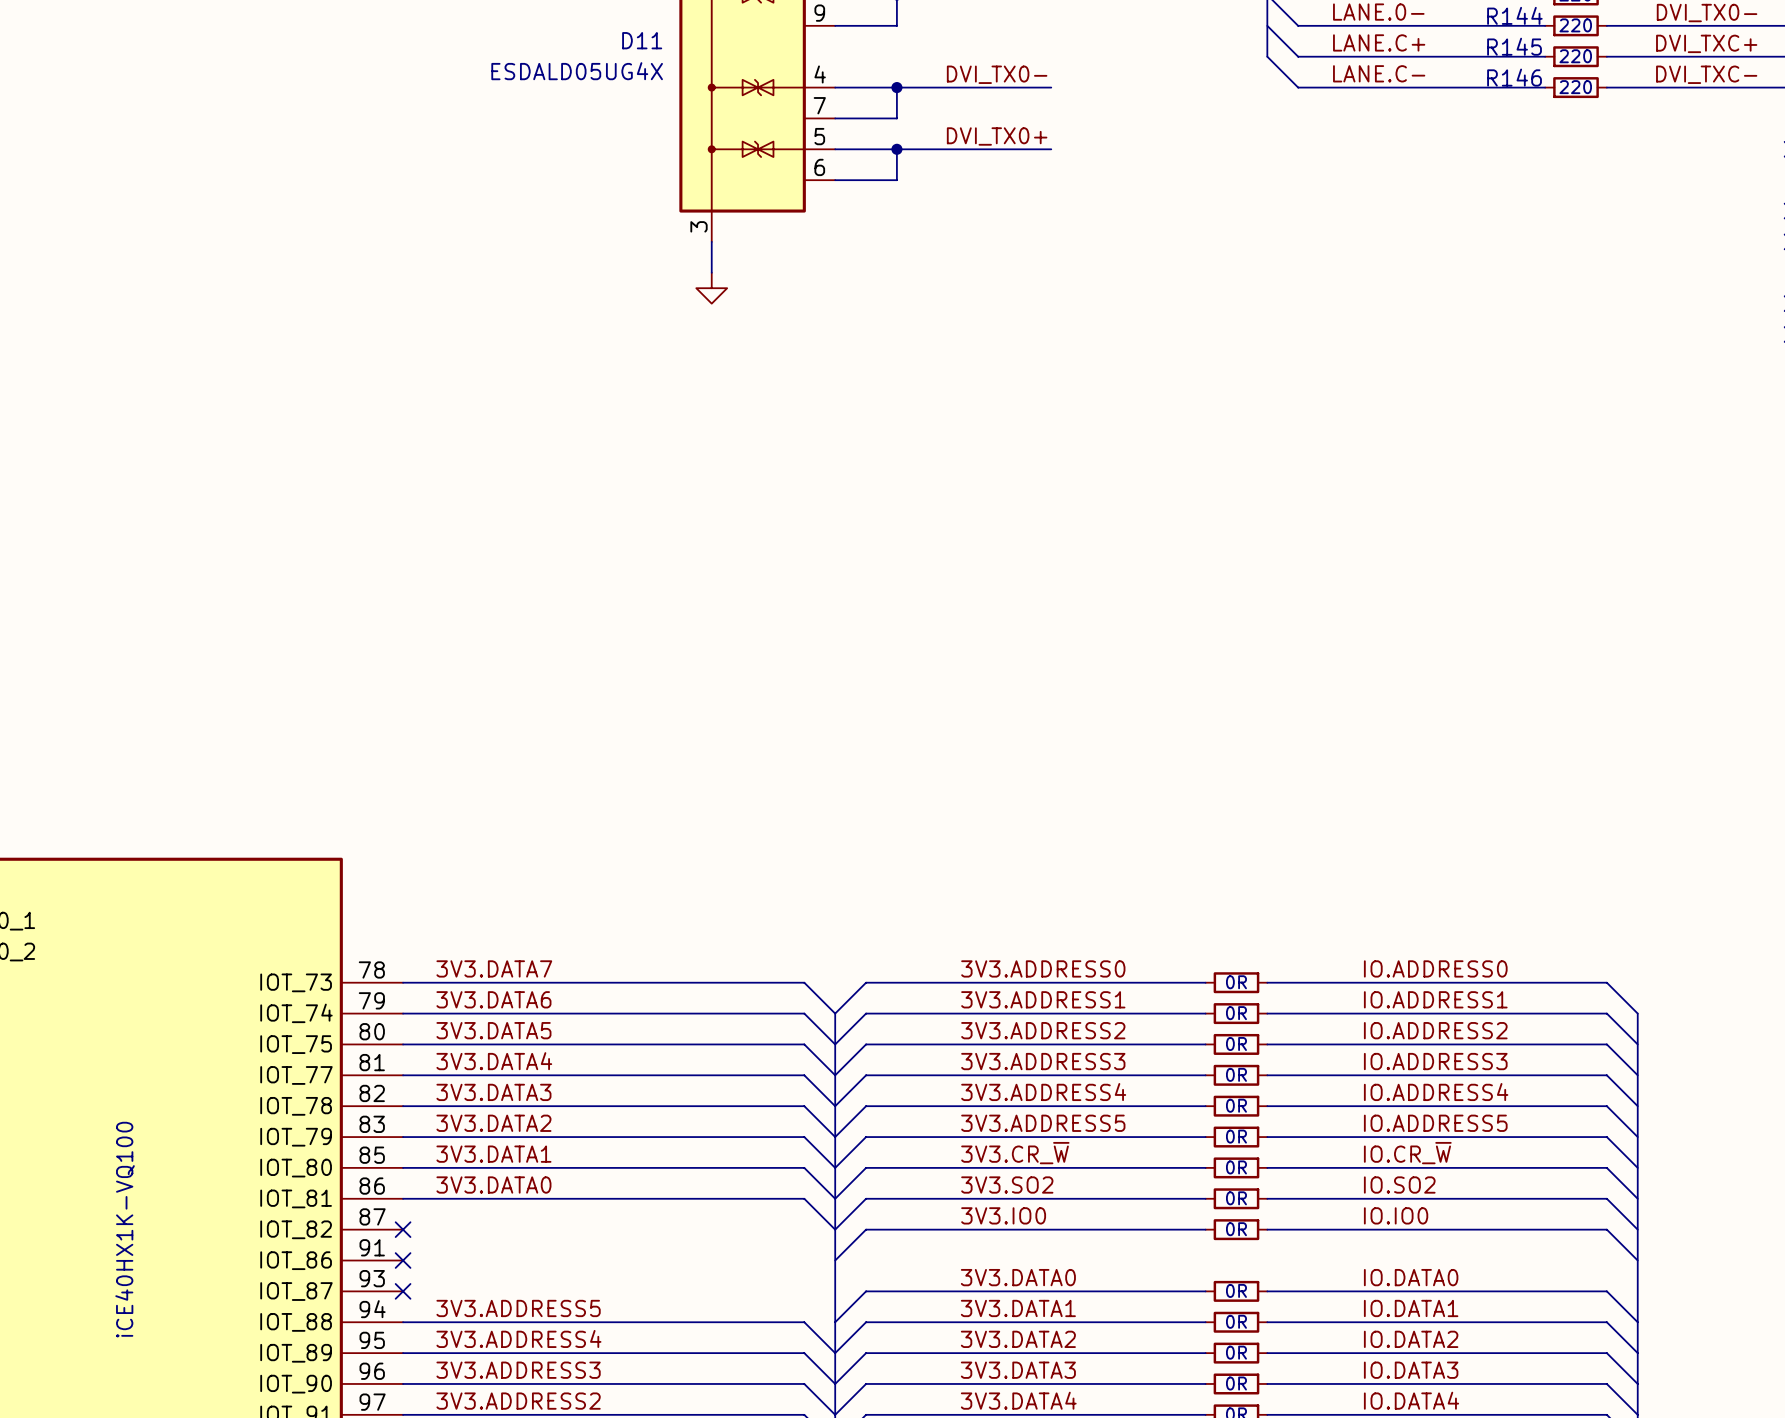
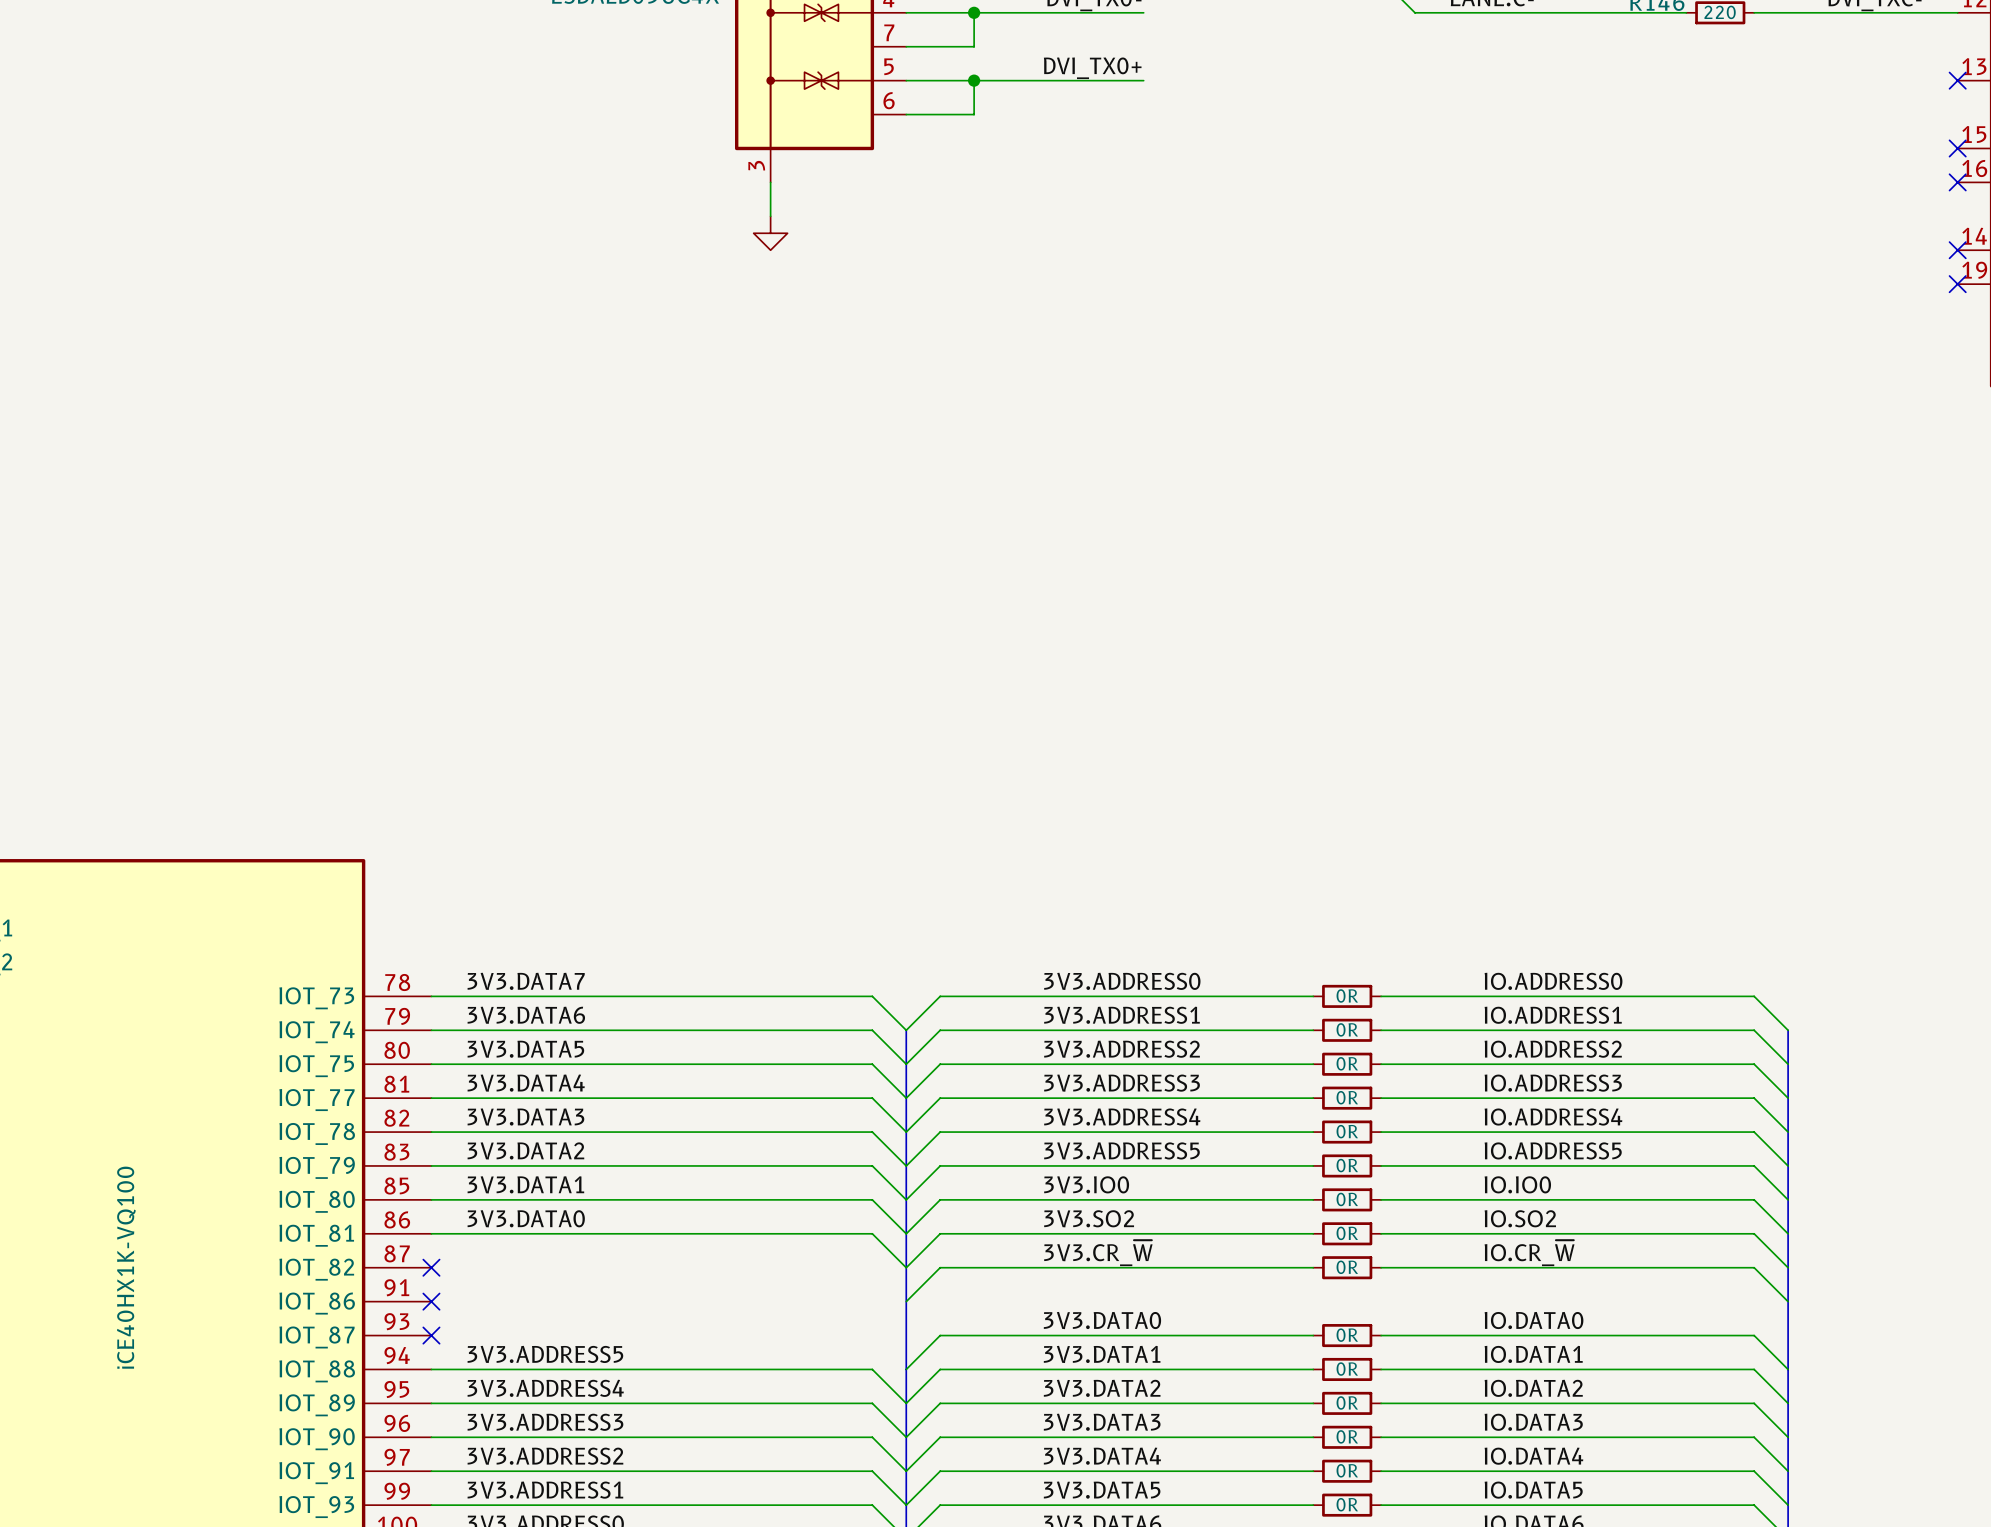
label: 3V3.CR_~{W} (1015, 1153) -> 3V3.IO0 (1086, 1184)
label: IO.CR_~{W} (1407, 1153) -> IO.IO0 (1517, 1184)
label: 3V3.IO0 (1003, 1215) -> 3V3.CR_~{W} (1098, 1253)
label: IO.IO0 (1396, 1215) -> IO.CR_~{W} (1529, 1253)

